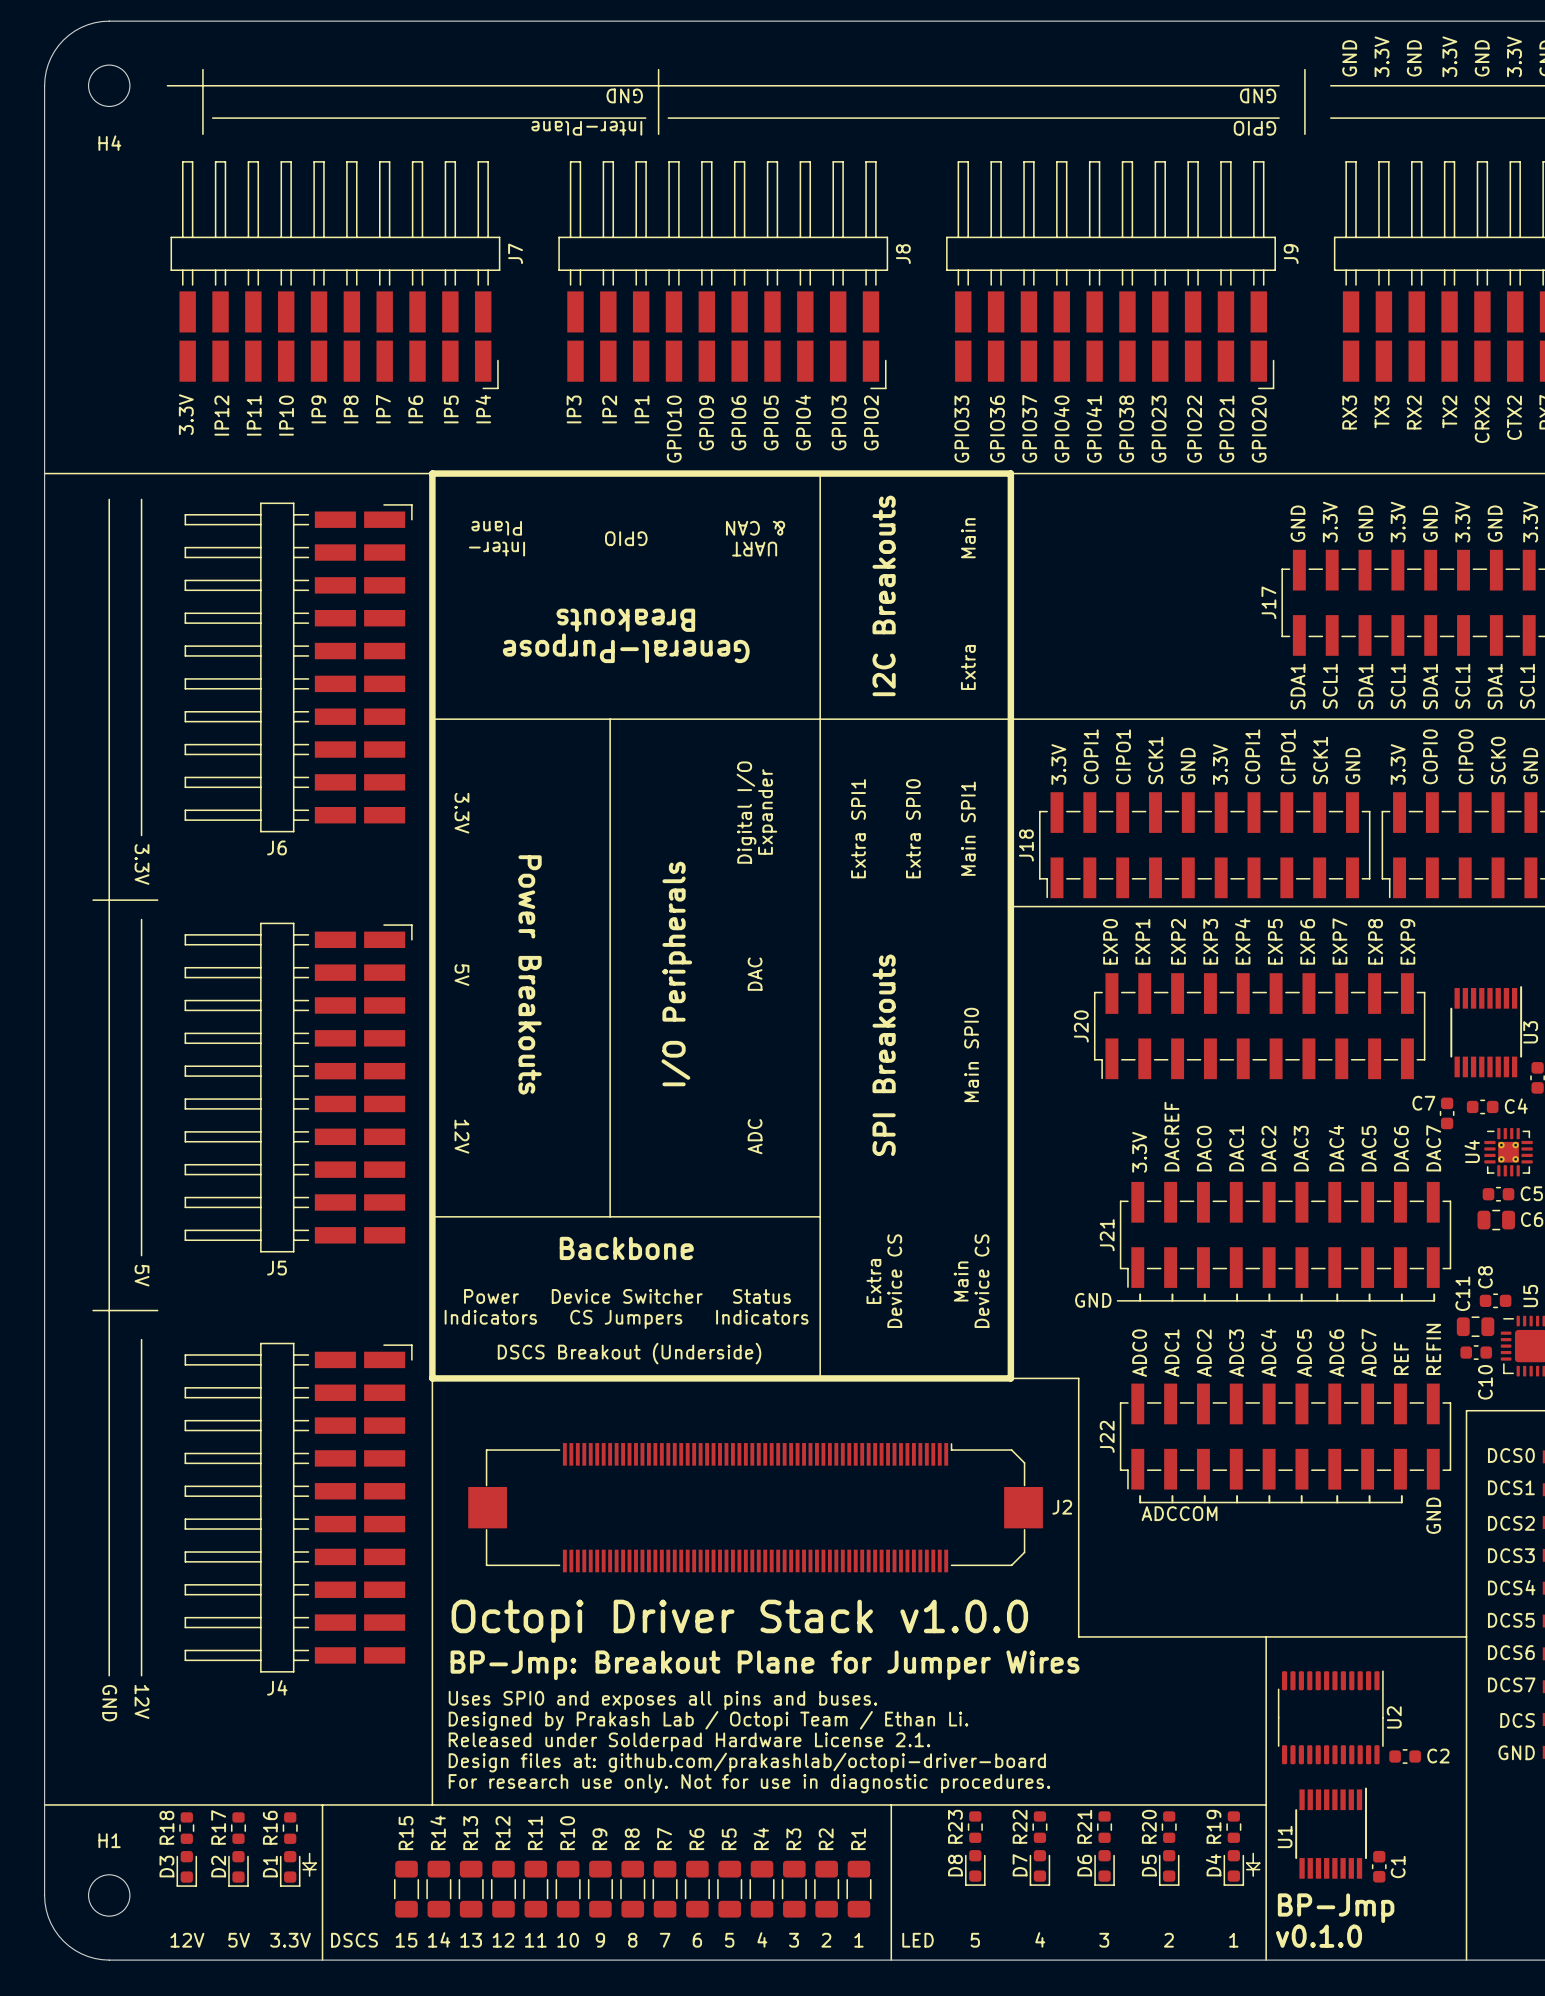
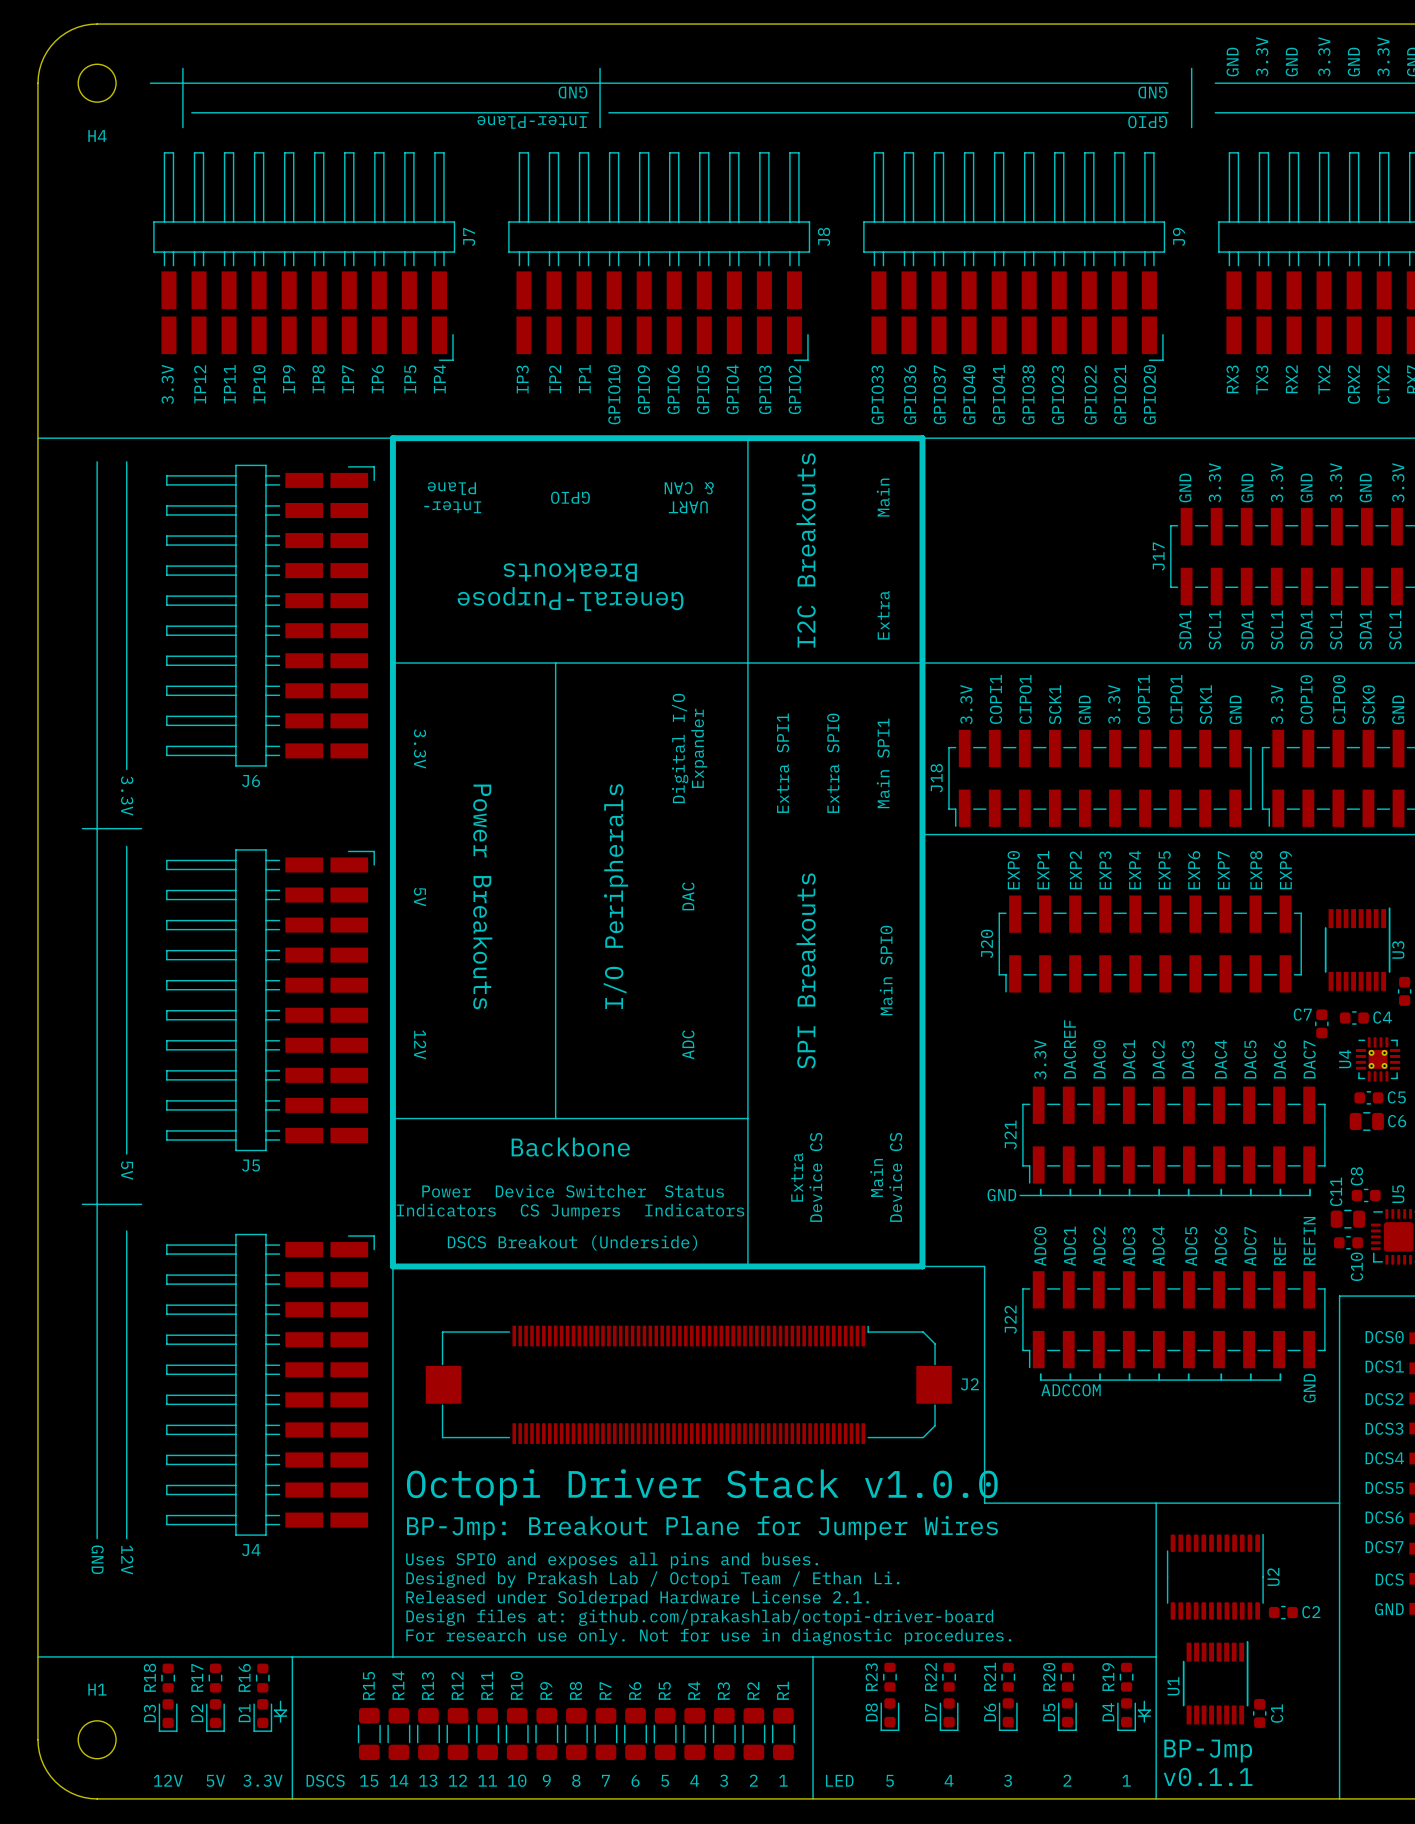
text: v0.1.0 (1319, 1936) -> v0.1.1 (1208, 1777)

